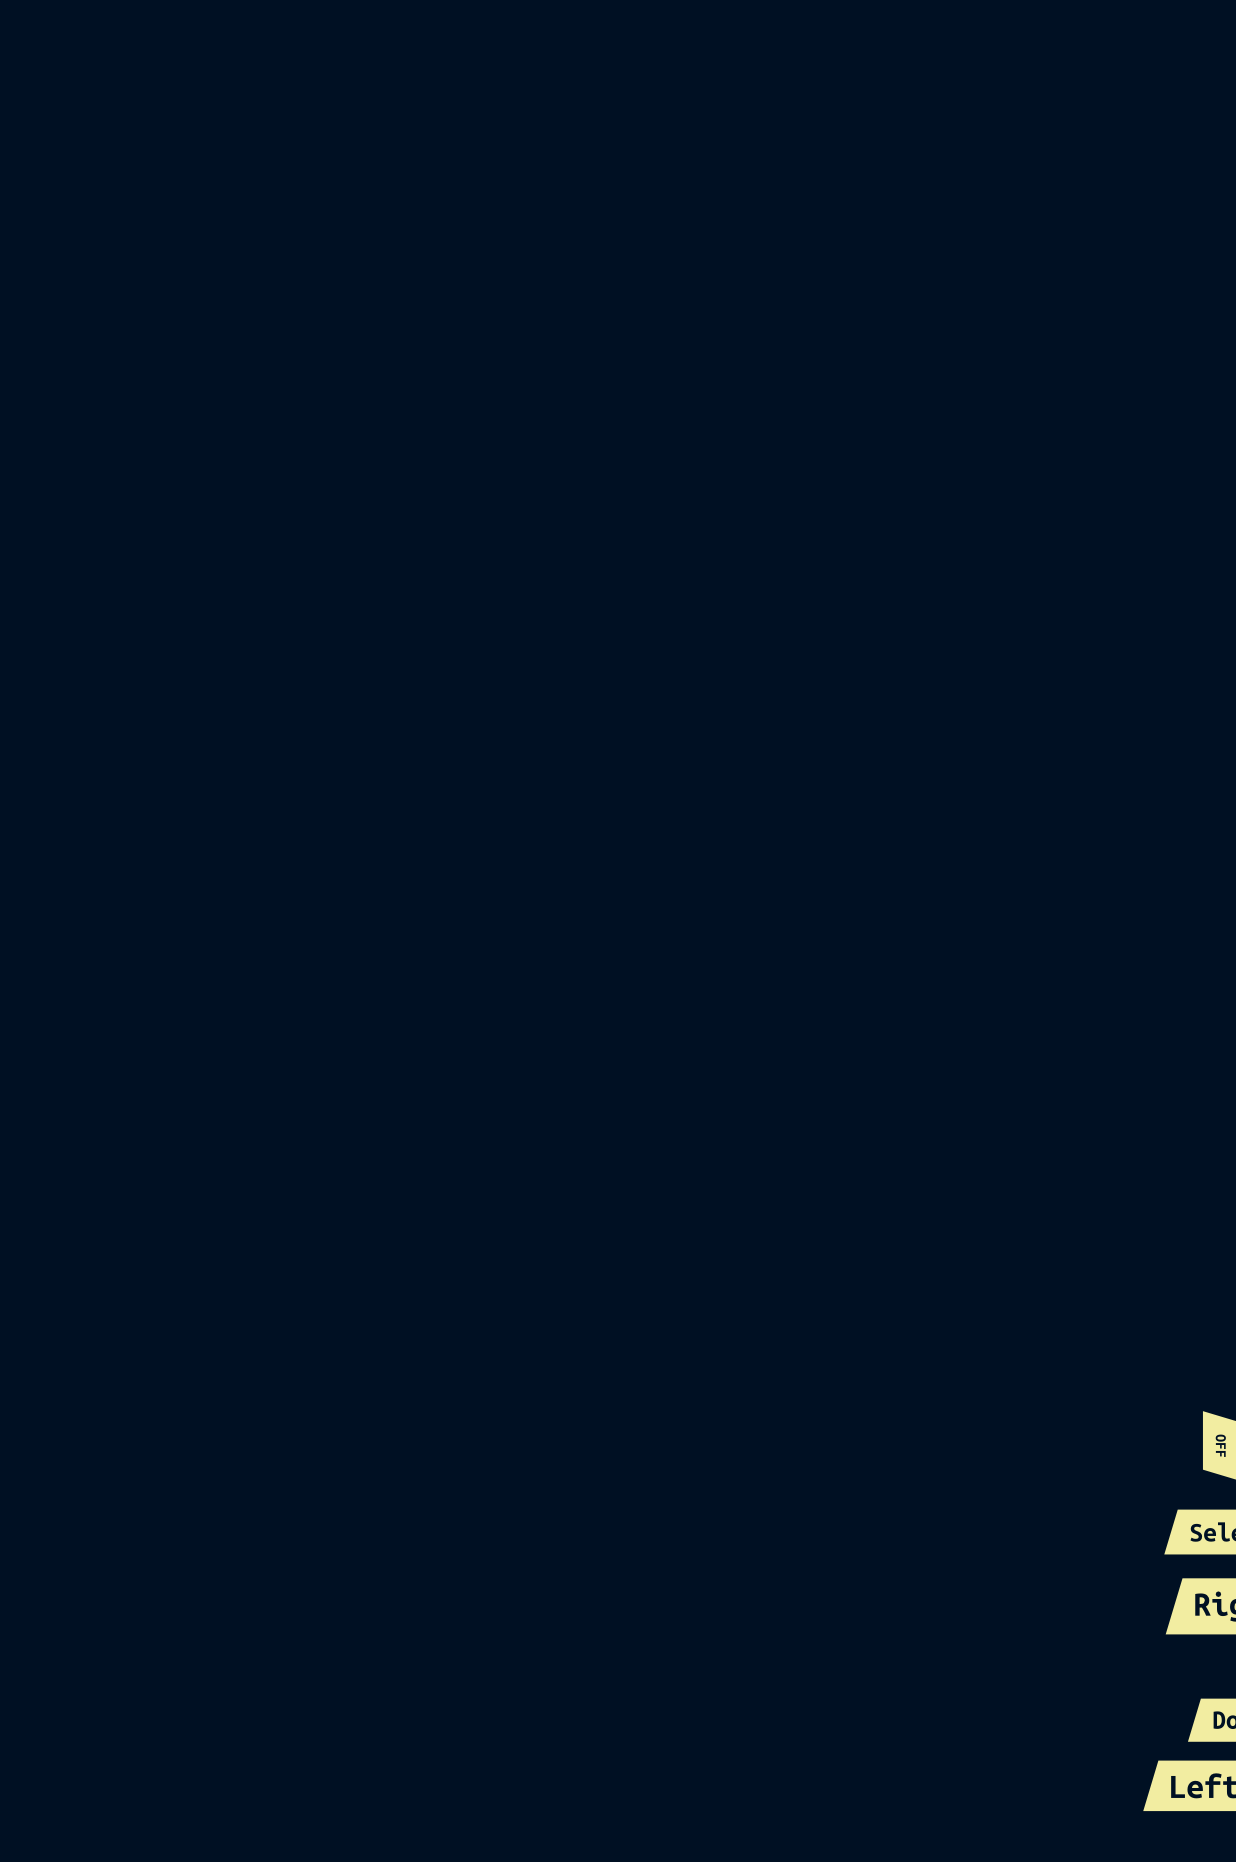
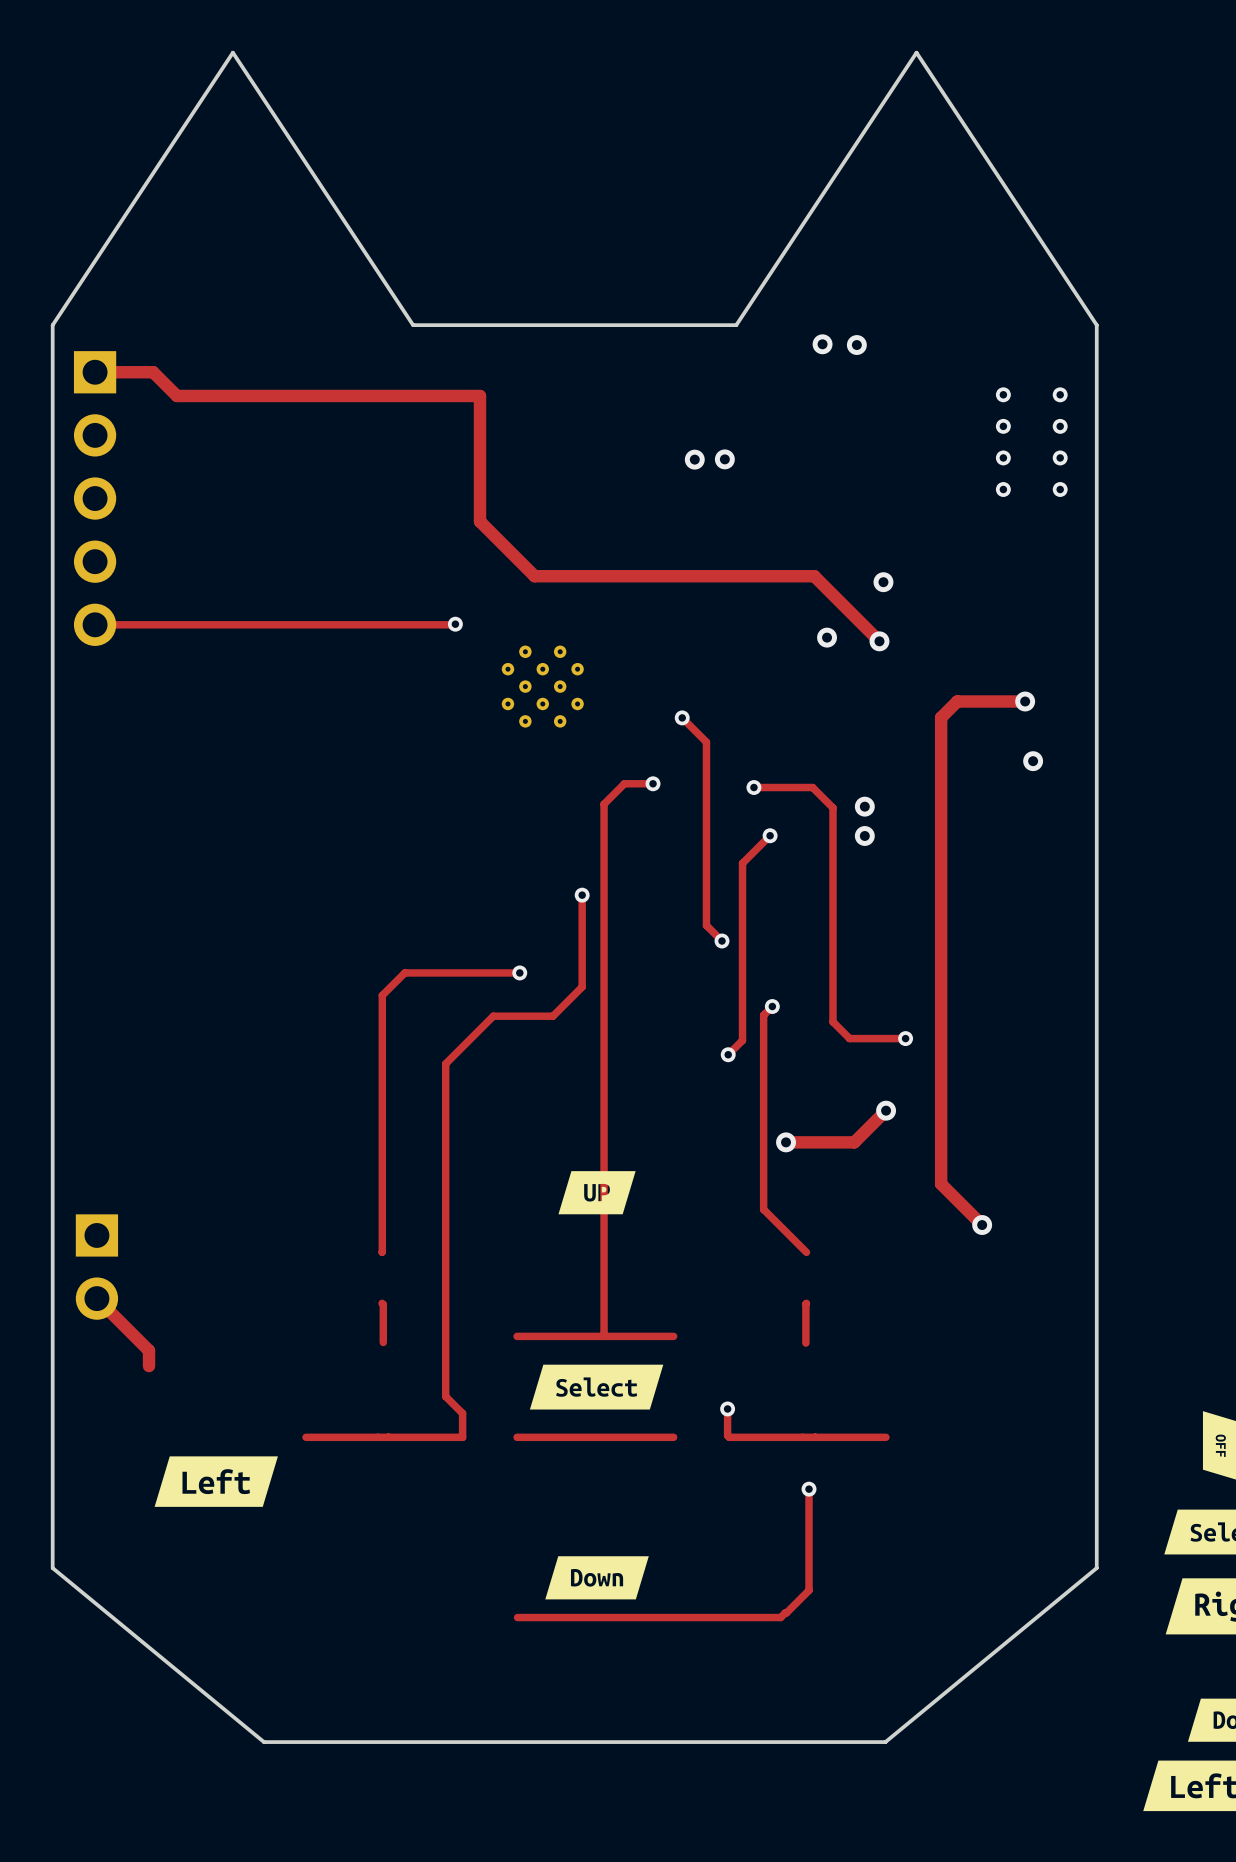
board edge: none -> (232, 52) (52, 325) (52, 1568) (263, 1742) (885, 1742) (1096, 1568) (1096, 325) (916, 52) (736, 325) (413, 325) (232, 52)
via: none -> (822, 344)
via: none -> (856, 345)
track: none -> (95, 372) (153, 372) (176, 395) (480, 395) (480, 521) (534, 576) (814, 576) (879, 641)
via: none -> (1003, 394)
via: none -> (1060, 394)
via: none -> (1003, 426)
via: none -> (1060, 426)
via: none -> (1003, 457)
via: none -> (1060, 457)
via: none -> (694, 459)
via: none -> (724, 459)
via: none -> (1003, 489)
via: none -> (1060, 489)
part: none -> (95, 498)
via: none -> (883, 582)
track: none -> (455, 624) (95, 624)
via: none -> (455, 624)
via: none -> (827, 637)
via: none -> (879, 641)
part: none -> (542, 686)
track: none -> (1025, 701) (957, 701) (941, 717) (941, 1184) (982, 1225)
via: none -> (1025, 701)
track: none -> (682, 717) (706, 742) (706, 925) (722, 941)
via: none -> (682, 717)
via: none -> (1033, 761)
track: none -> (653, 783) (624, 783) (604, 804) (604, 1336)
via: none -> (653, 783)
track: none -> (753, 787) (812, 787) (833, 807) (833, 1021) (849, 1038) (905, 1038)
via: none -> (753, 787)
via: none -> (864, 806)
track: none -> (770, 835) (742, 863) (742, 1040) (728, 1054)
via: none -> (770, 835)
via: none -> (864, 835)
track: none -> (582, 895) (582, 987) (552, 1016) (493, 1016) (445, 1063) (445, 1396) (462, 1413) (462, 1437) (306, 1437)
via: none -> (582, 895)
via: none -> (722, 941)
track: none -> (519, 972) (404, 972) (382, 995) (382, 1252)
via: none -> (519, 972)
track: none -> (772, 1006) (763, 1015) (763, 1209) (806, 1252)
via: none -> (772, 1006)
via: none -> (905, 1038)
via: none -> (728, 1054)
track: none -> (886, 1110) (854, 1142) (786, 1142)
via: none -> (886, 1110)
via: none -> (786, 1142)
drawing: none -> [558, 1171, 636, 1215]
via: none -> (982, 1225)
part: none -> (96, 1267)
track: none -> (96, 1298) (149, 1350) (149, 1366)
track: none -> (382, 1303) (383, 1342)
track: none -> (806, 1303) (805, 1343)
track: none -> (517, 1336) (673, 1336)
drawing: none -> [529, 1364, 664, 1410]
track: none -> (727, 1408) (727, 1435) (729, 1437) (885, 1437)
via: none -> (727, 1408)
track: none -> (517, 1437) (673, 1437)
drawing: none -> [154, 1456, 278, 1507]
track: none -> (809, 1489) (809, 1590) (780, 1617) (517, 1617)
via: none -> (809, 1489)
drawing: none -> [545, 1556, 649, 1600]

